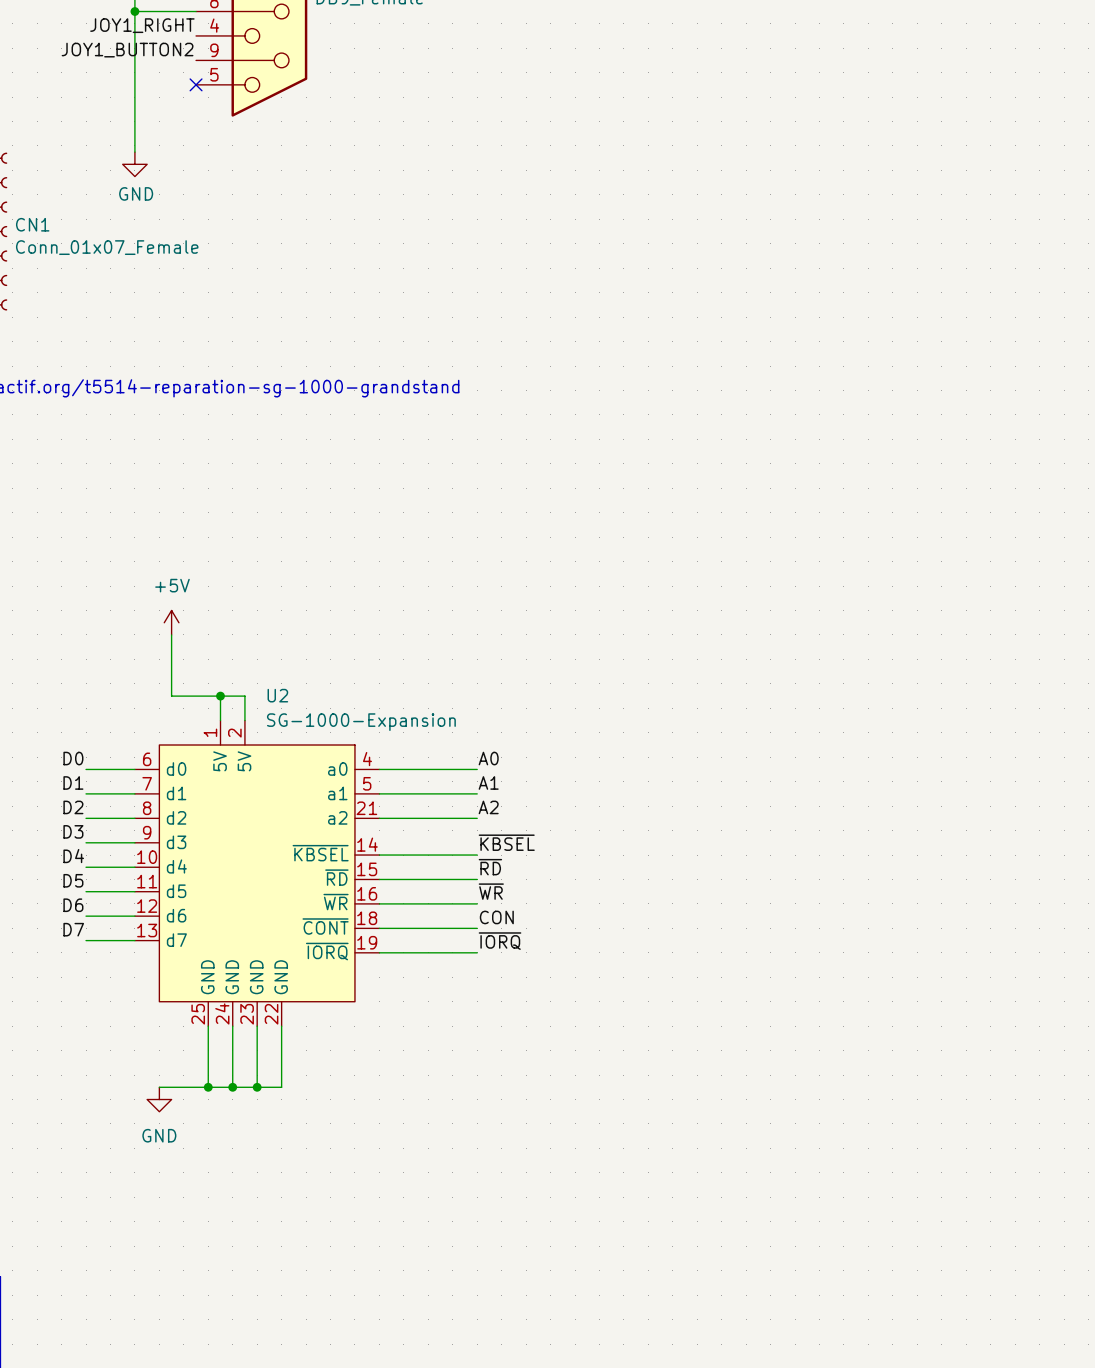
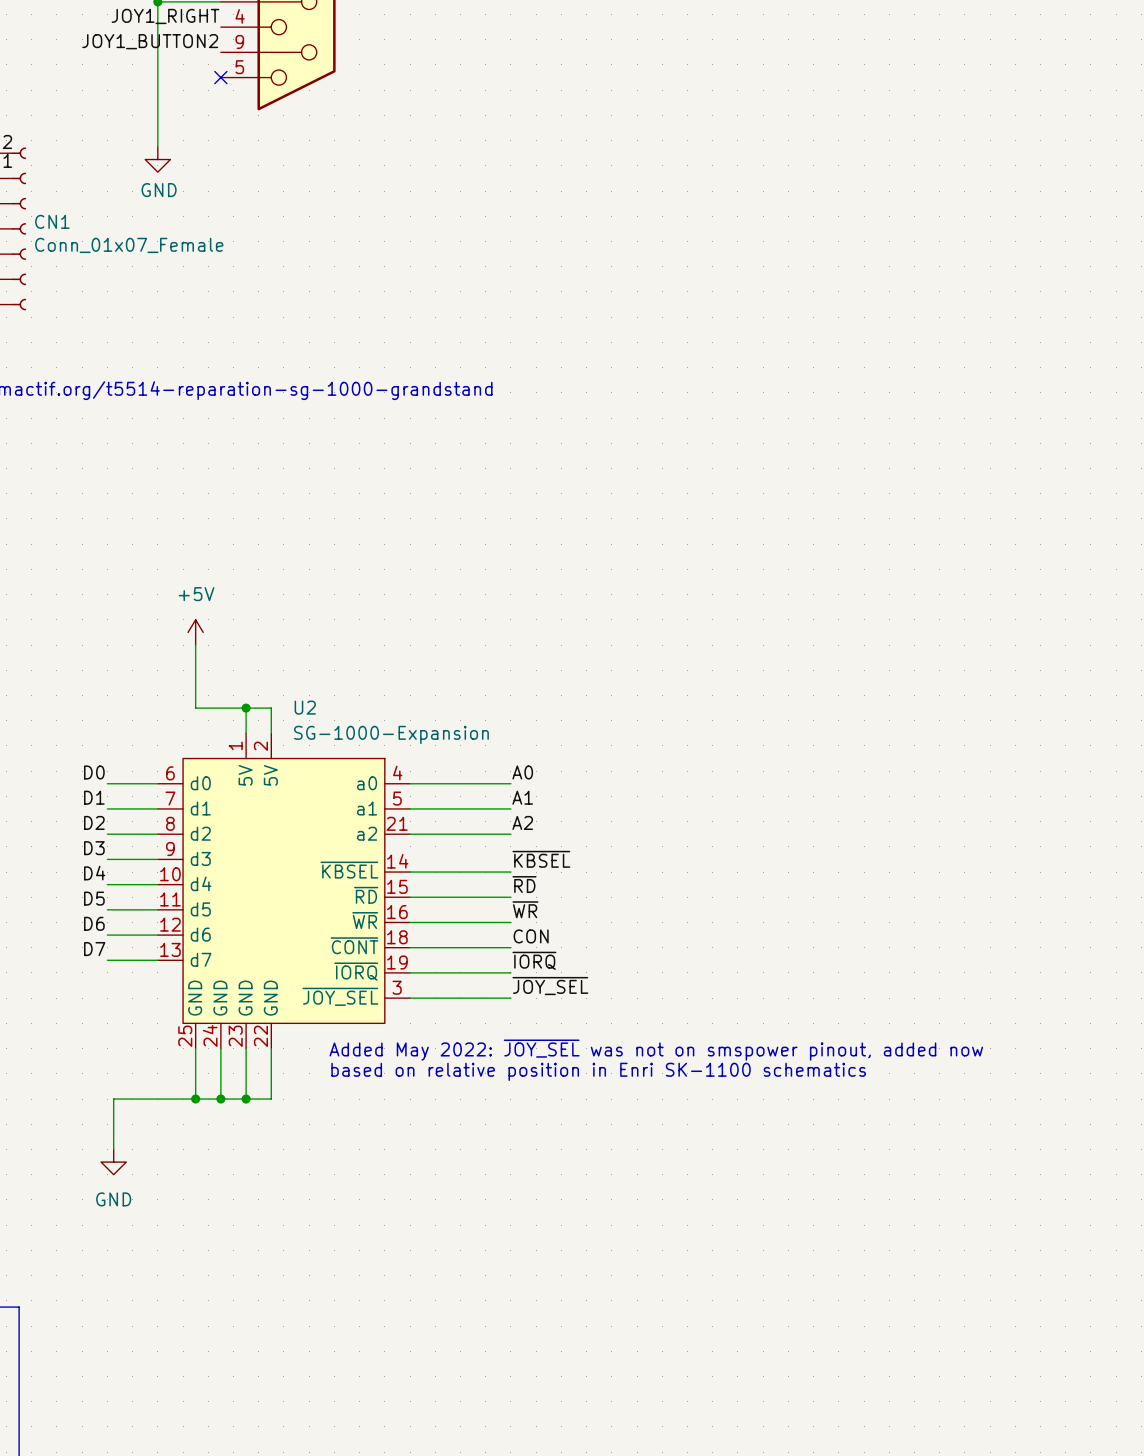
U2 symbol: [134, 720, 380, 1027] -> [157, 733, 411, 1049]
label: none -> ~{JOY_SEL} (550, 986)
wire: none -> (410, 998) (510, 998)
wire: none -> (195, 1048) (195, 1099)
wire: none -> (220, 1048) (220, 1099)
wire: (208, 1026) (208, 1087) -> none
wire: none -> (246, 1048) (246, 1099)
wire: (232, 1026) (232, 1087) -> none
wire: none -> (271, 1048) (271, 1099) (113, 1099) (113, 1149)
wire: (257, 1026) (257, 1087) -> none
wire: (281, 1026) (281, 1087) (159, 1087) -> none
text: none -> Added May 2022: ~{JOY_SEL} was not on smspower pinout, added now (656, 1050)
text: none -> based on relative position in Enri SK-1100 schematics (598, 1071)
junction: none -> (195, 1099)
junction: none -> (220, 1099)
junction: none -> (246, 1099)
junction: (208, 1087) -> none
junction: (232, 1087) -> none
junction: (257, 1087) -> none
power symbol position: GND (159, 1099) -> GND (113, 1162)

